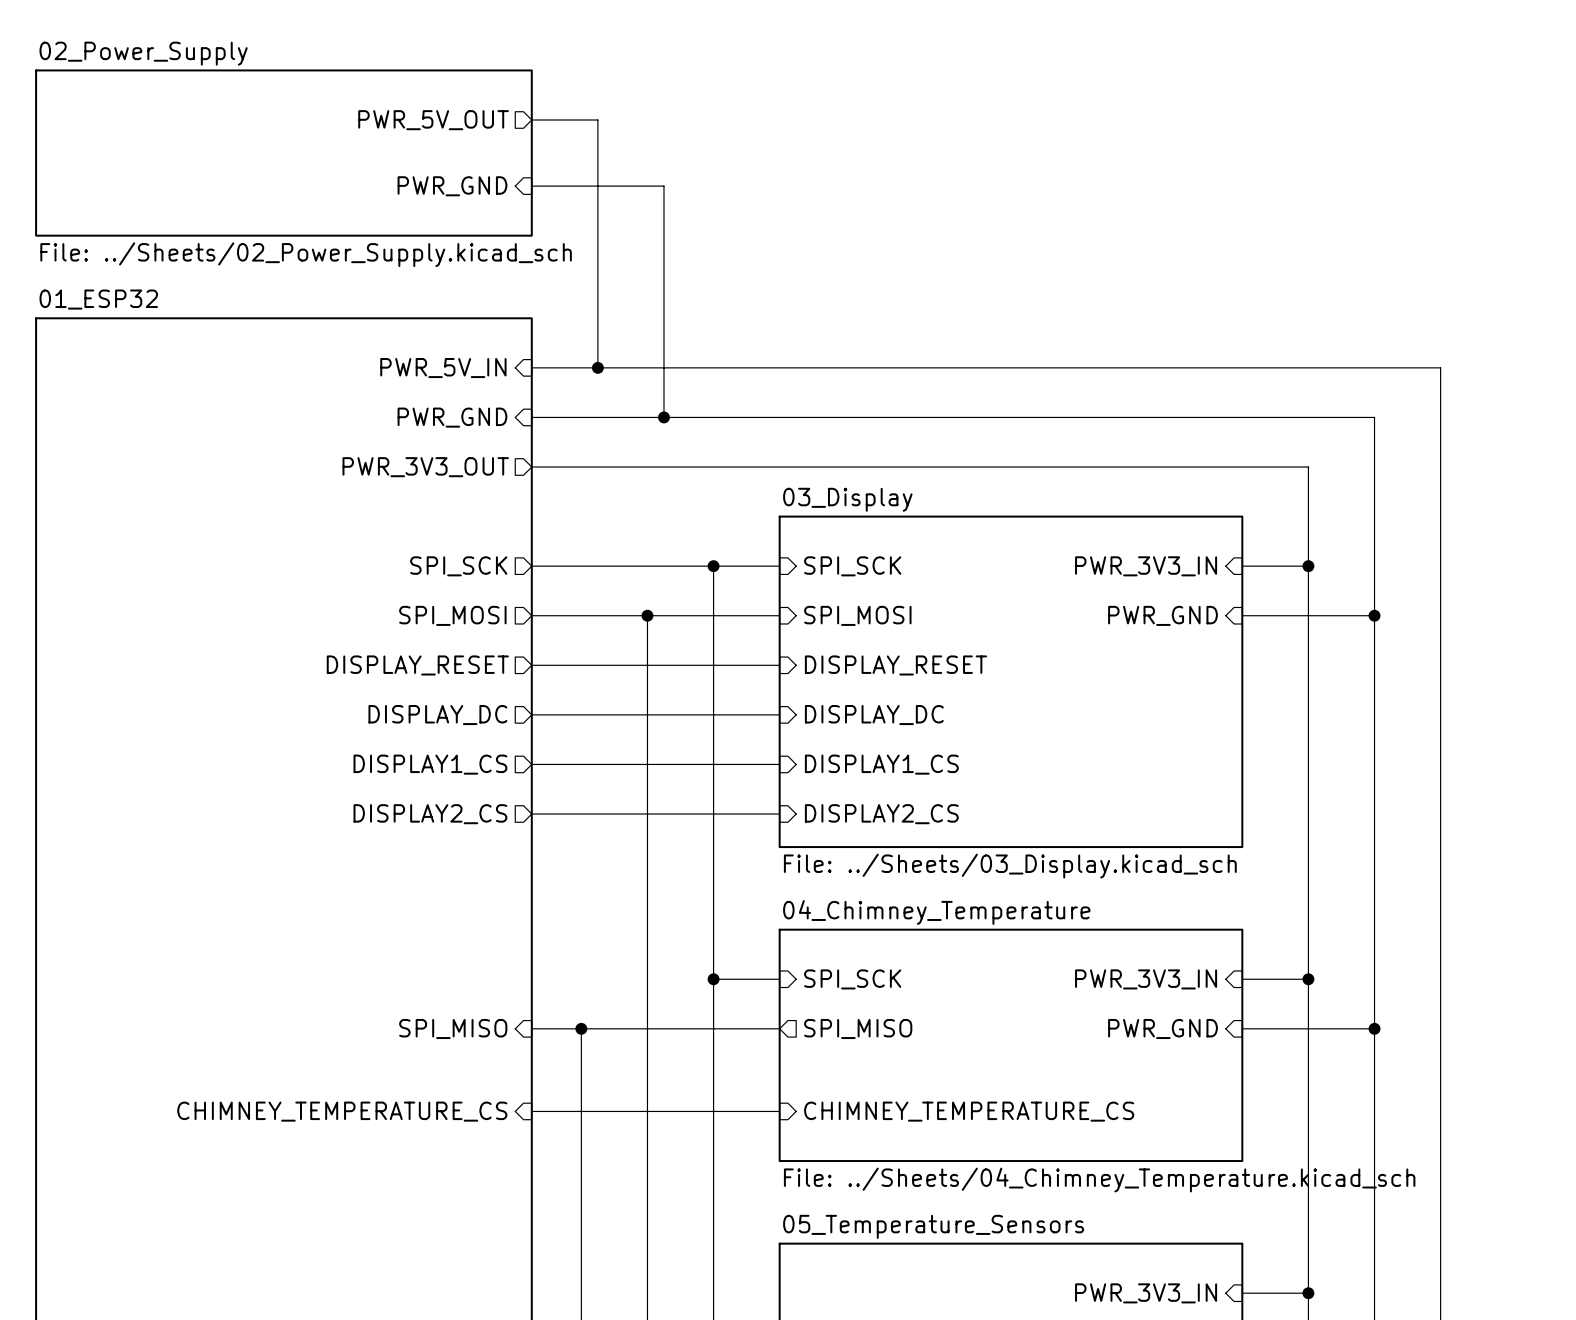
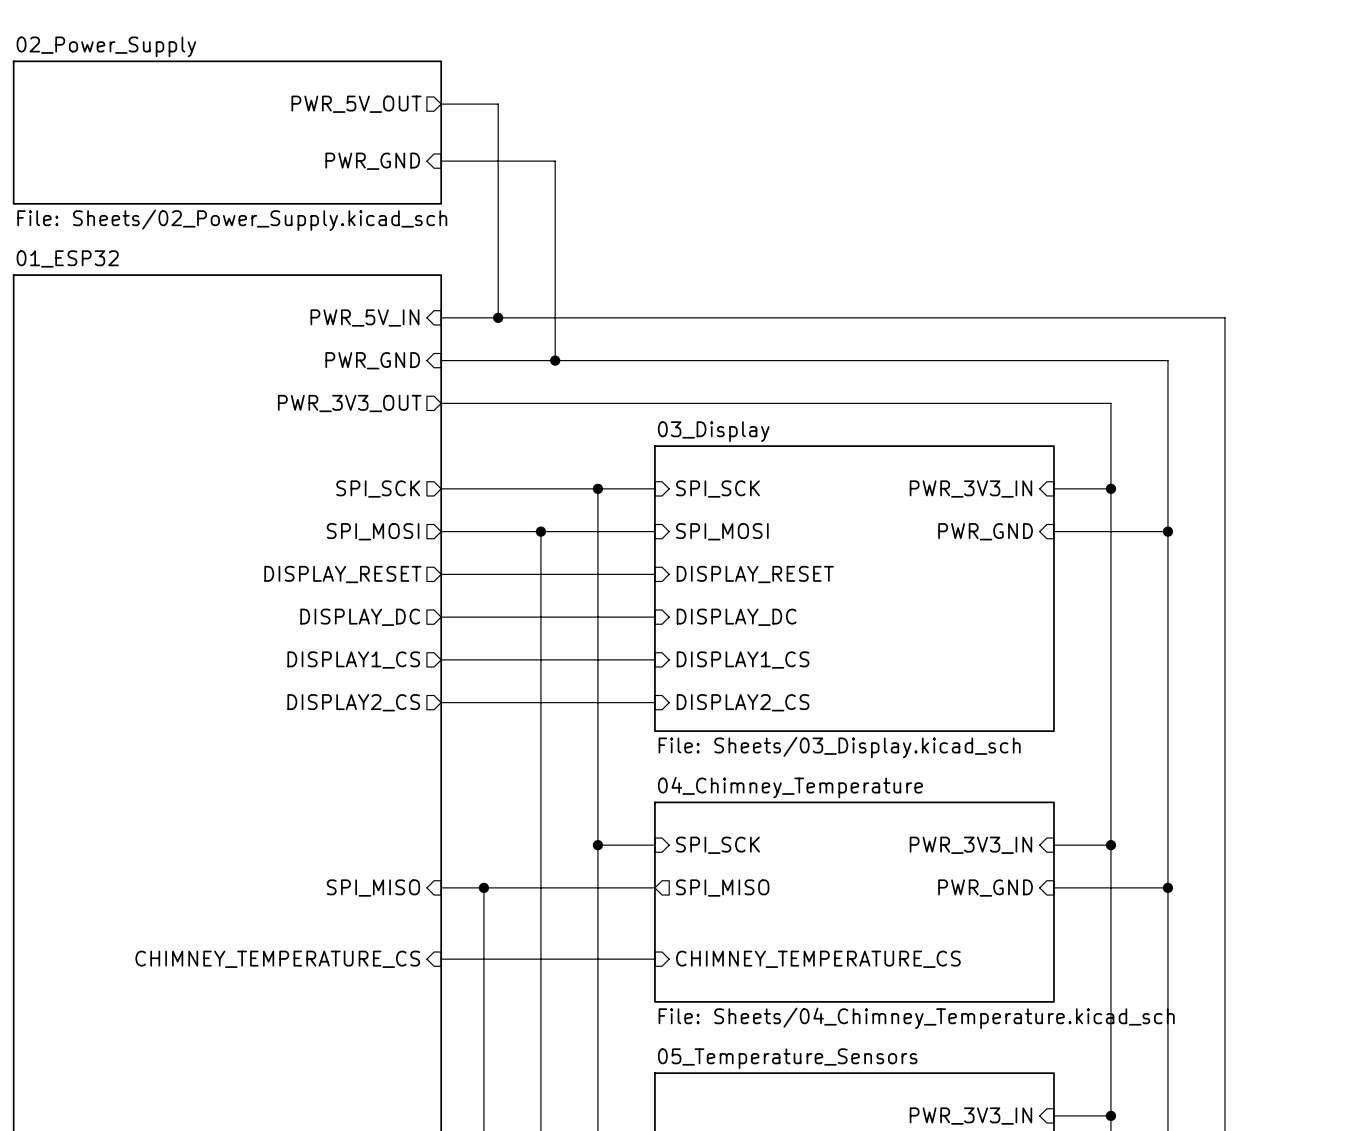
sheet 02_Power_Supply value: File: ../Sheets/02_Power_Supply.kicad_sch (306, 254) -> File: Sheets/02_Power_Supply.kicad_sch (232, 220)
sheet 03_Display value: File: ../Sheets/03_Display.kicad_sch (1010, 866) -> File: Sheets/03_Display.kicad_sch (839, 747)
sheet 04_Chimney_Temperature value: File: ../Sheets/04_Chimney_Temperature.kicad_sch (1099, 1180) -> File: Sheets/04_Chimney_Temperature.kicad_sch (916, 1018)

